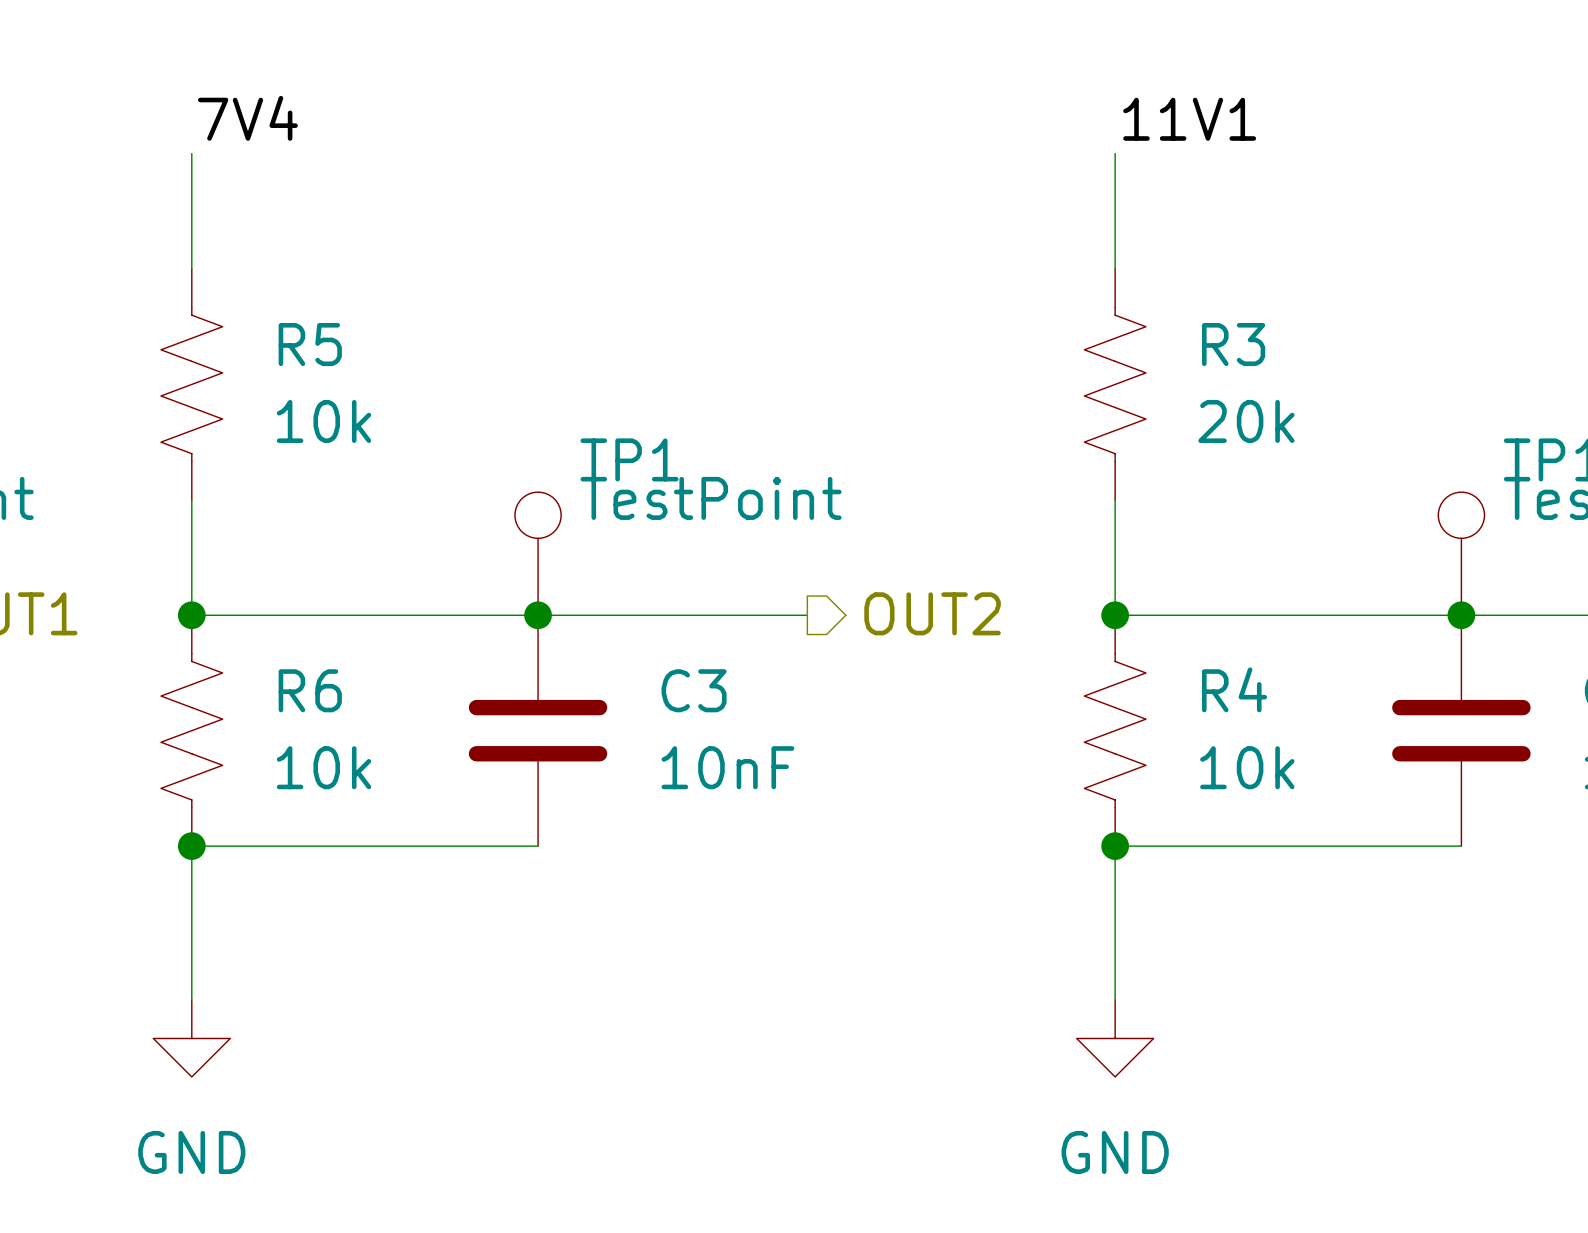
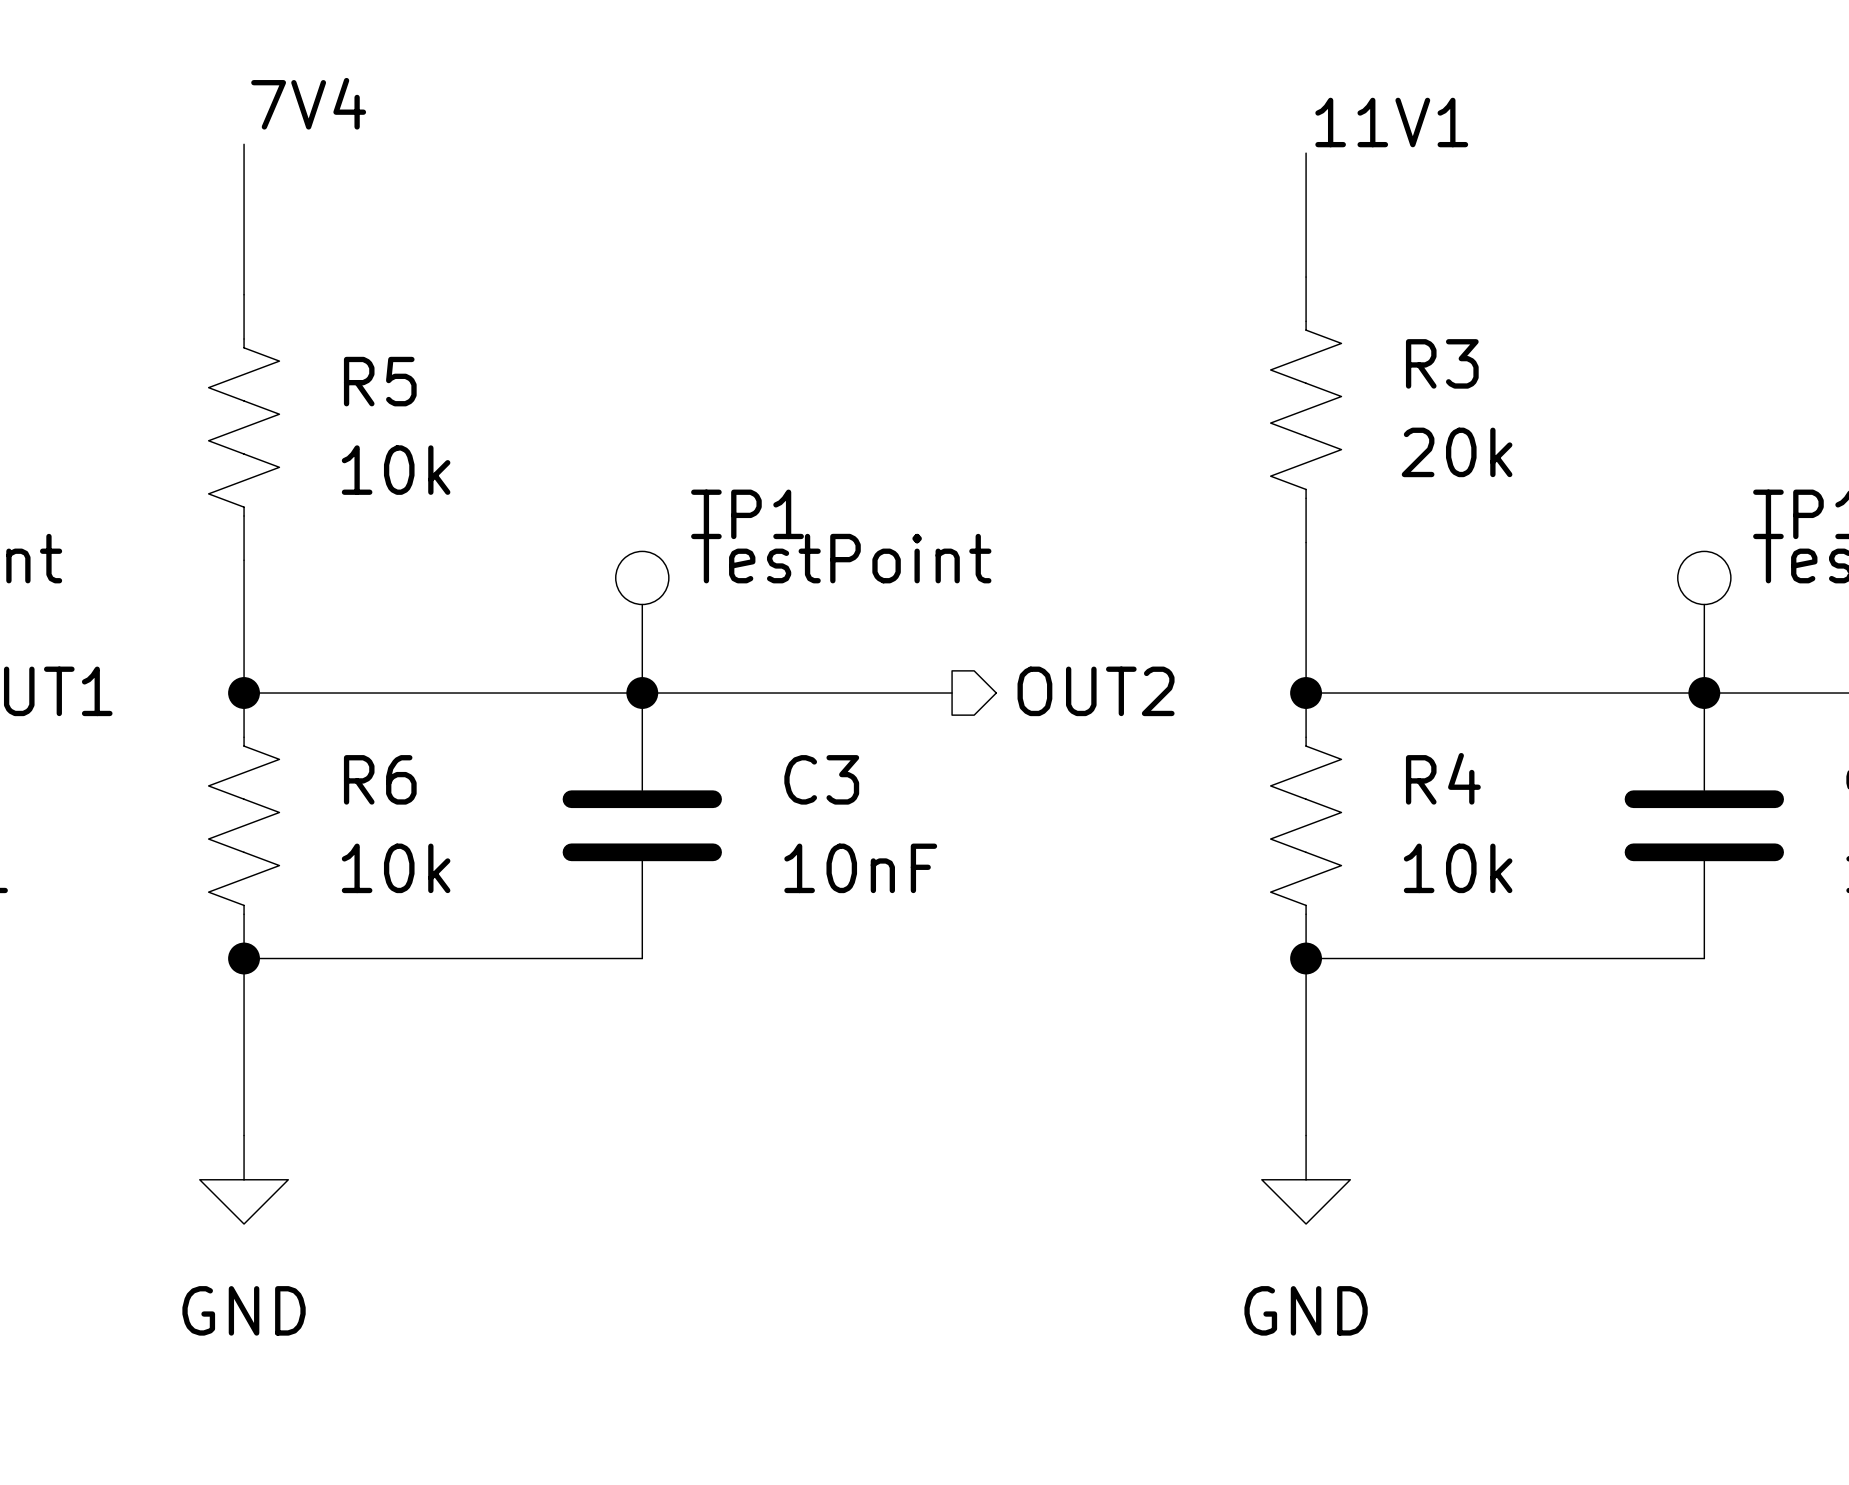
label position: 7V4 (247, 118) -> 7V4 (308, 103)
wire: none -> (244, 144) (244, 161)
wire: none -> (1306, 153) (1306, 161)
R3 position: (1115, 384) -> (1306, 409)

